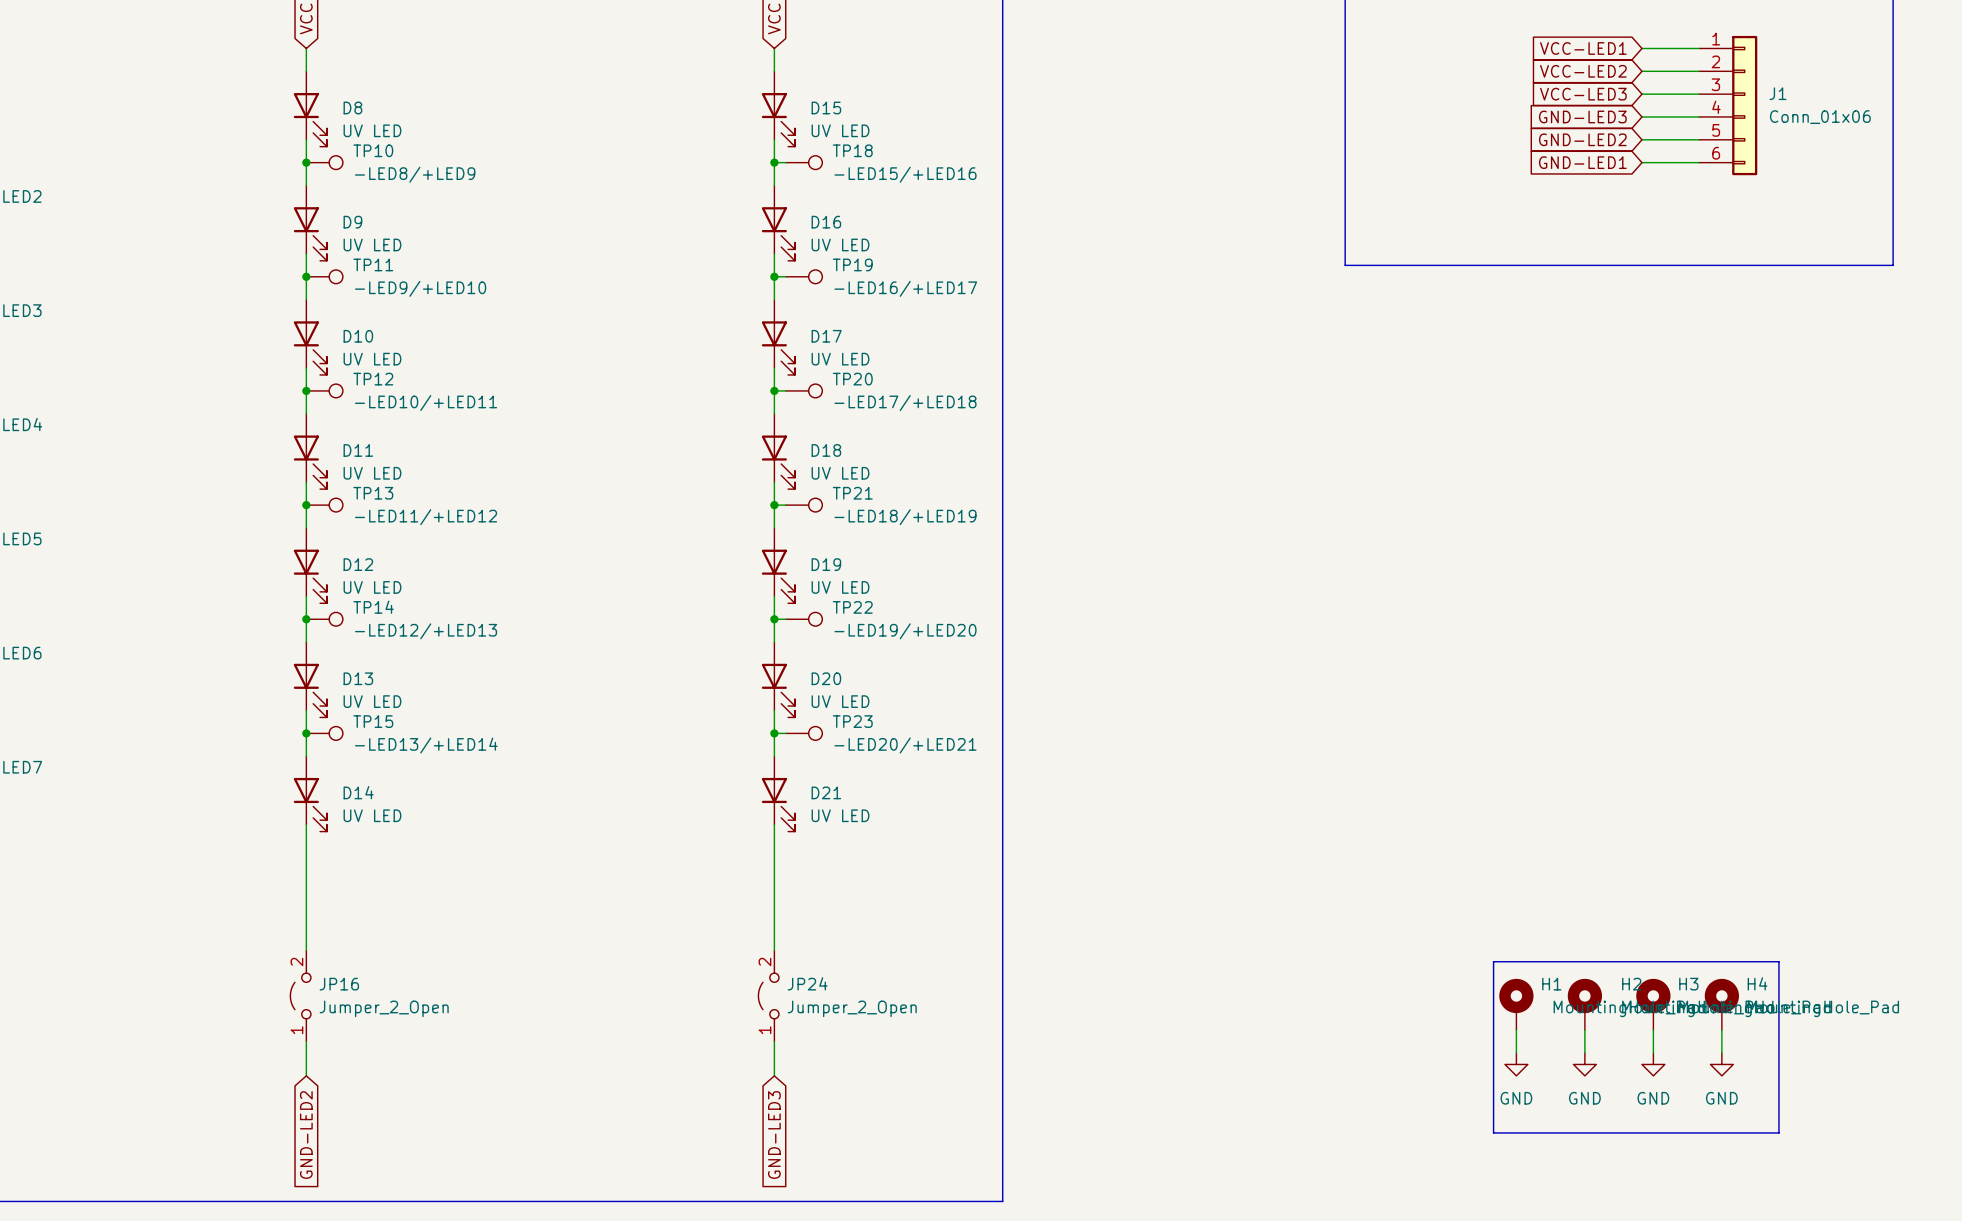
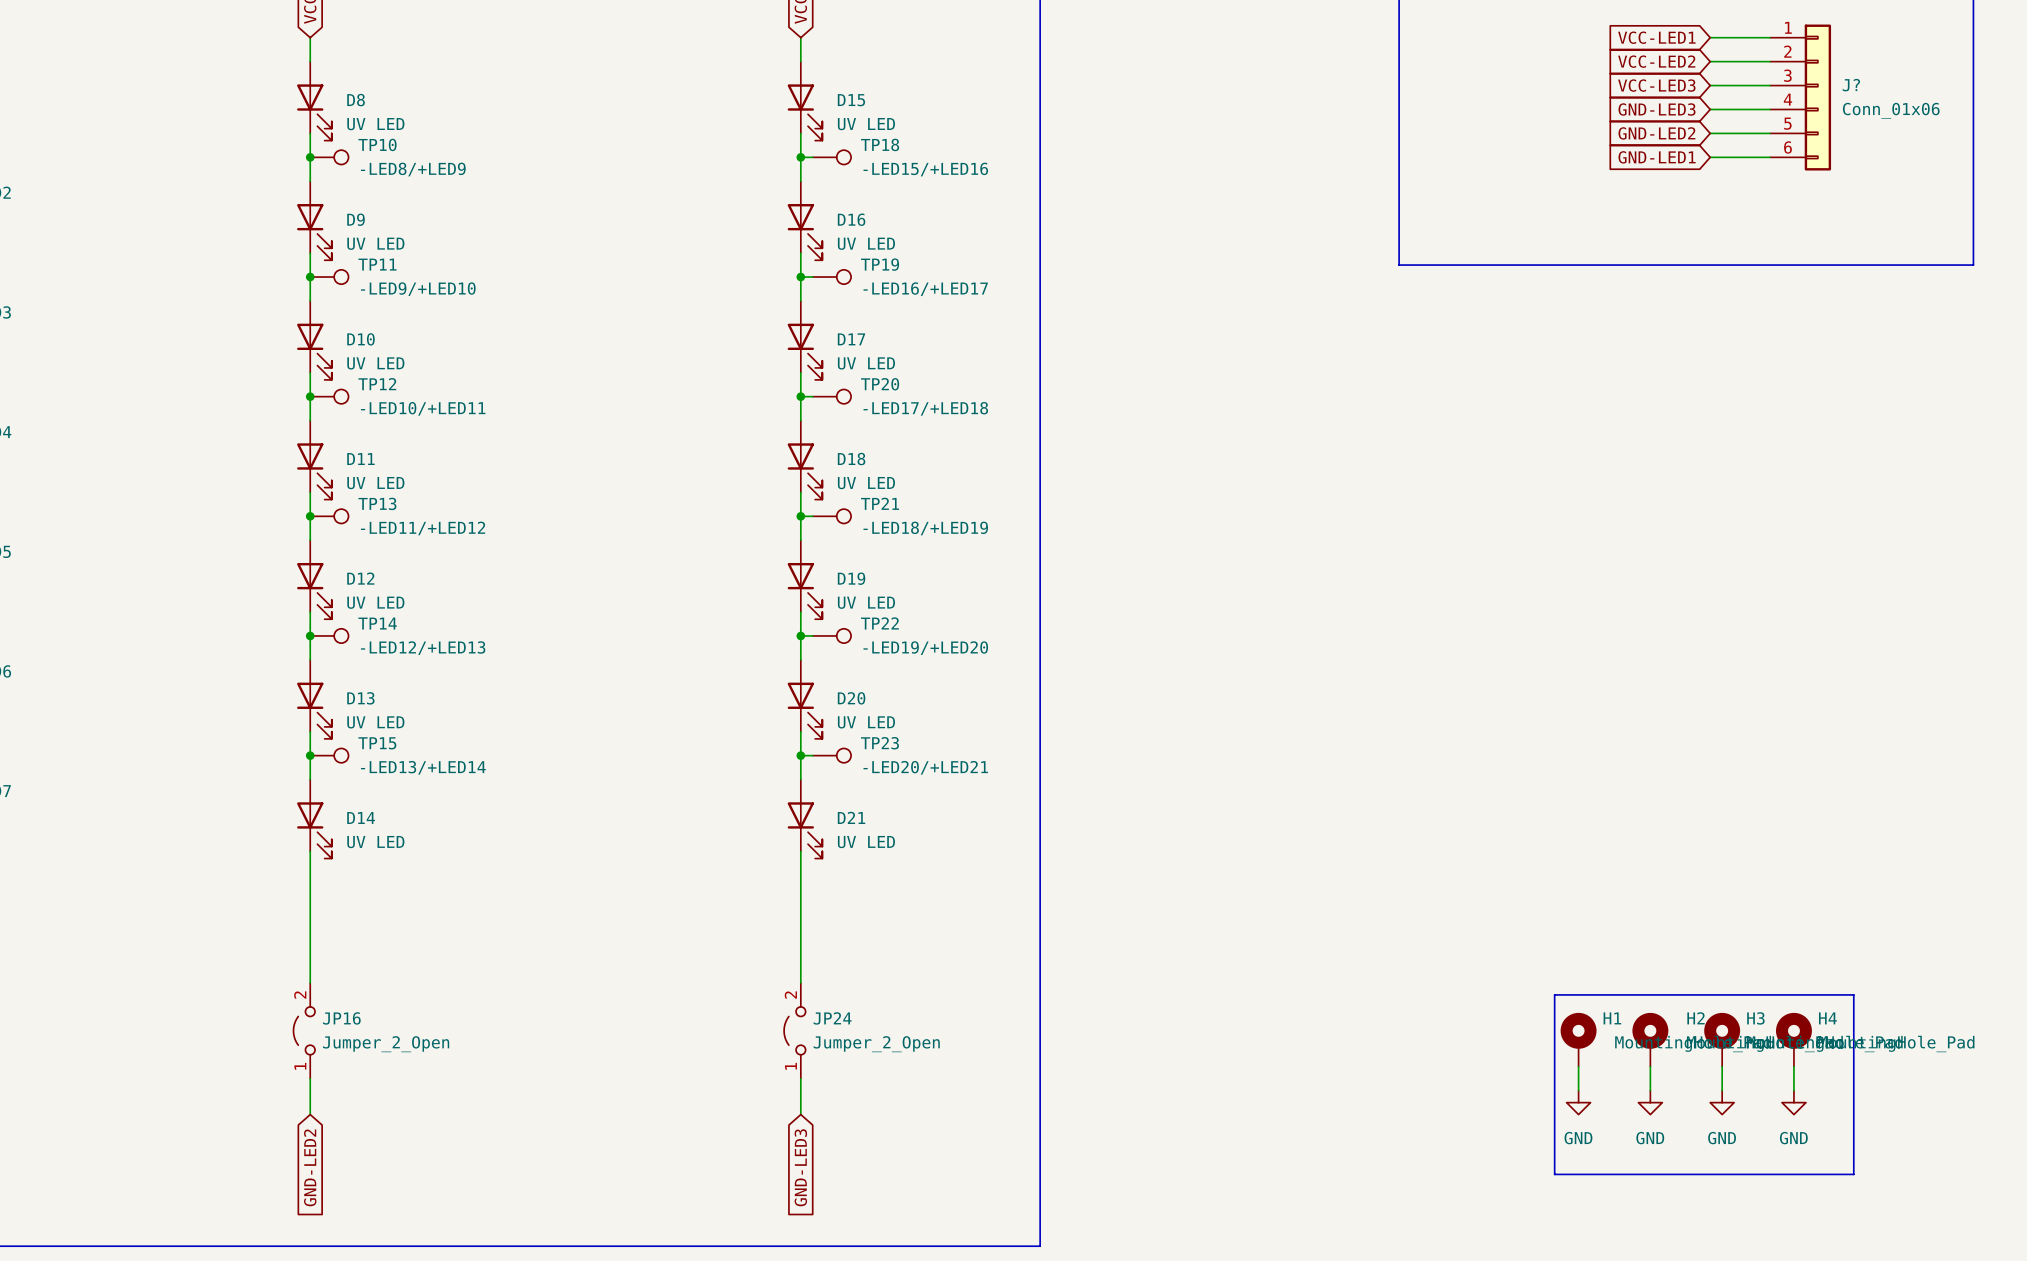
J1 name: J1 (1777, 93) -> J? (1851, 85)

